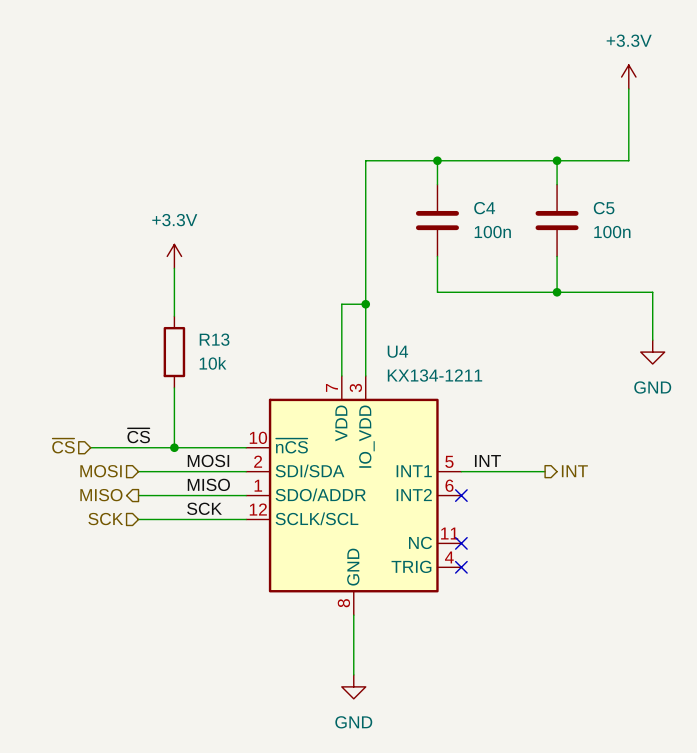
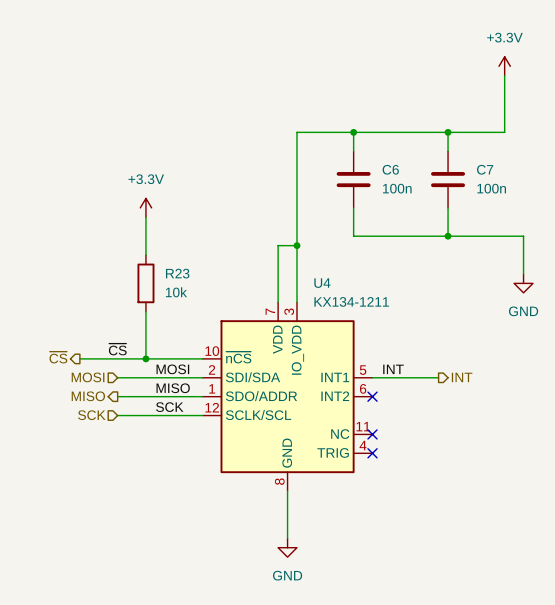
C4 name: C4 (484, 208) -> C6 (390, 169)
C5 name: C5 (604, 208) -> C7 (485, 169)
R13 name: R13 (214, 339) -> R23 (177, 273)
hierarchical label shape: input (63, 446) -> output (58, 357)

